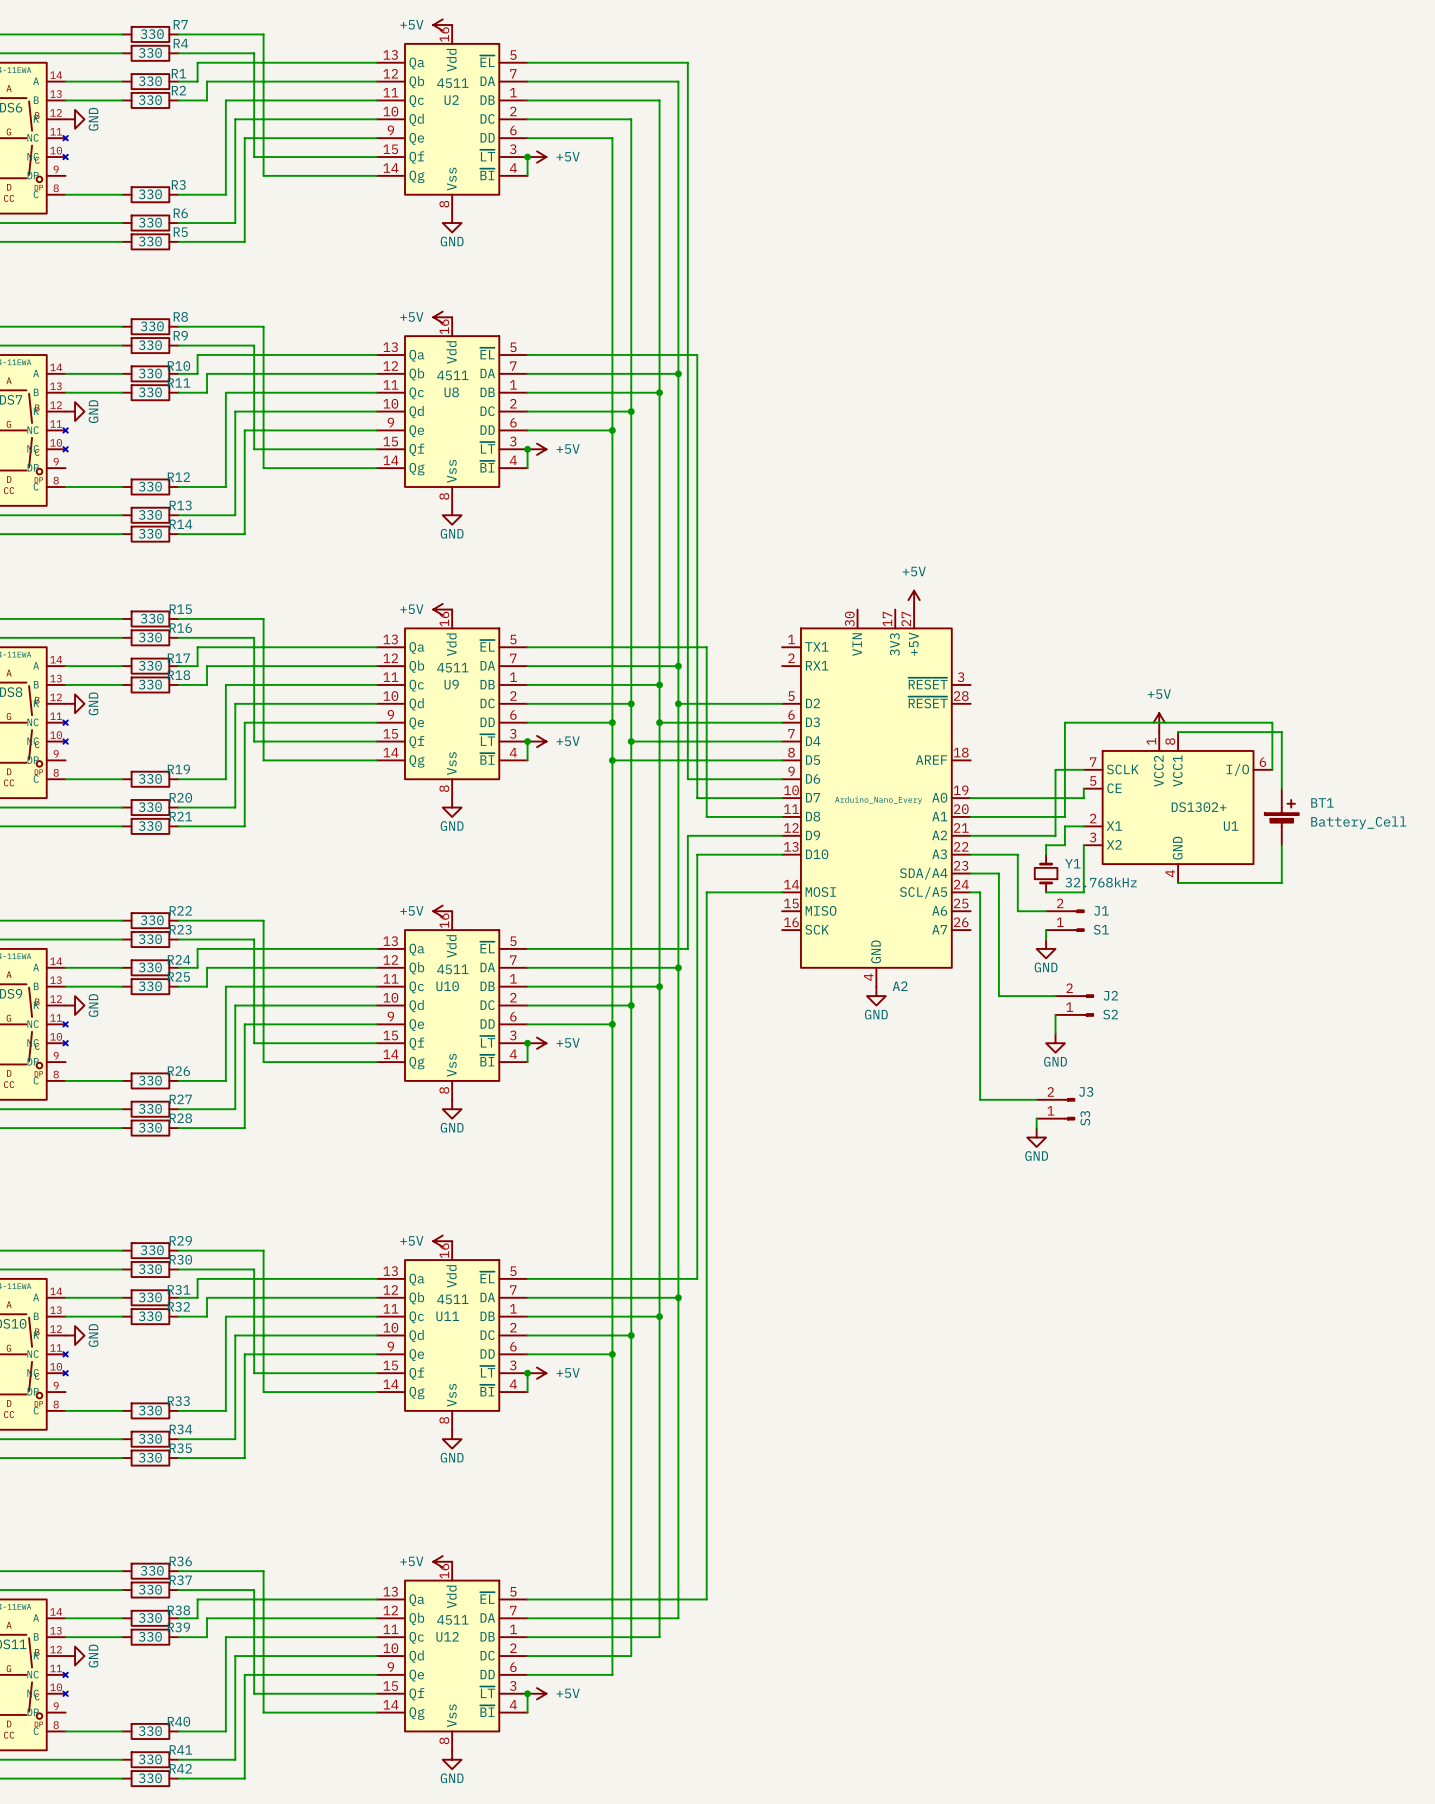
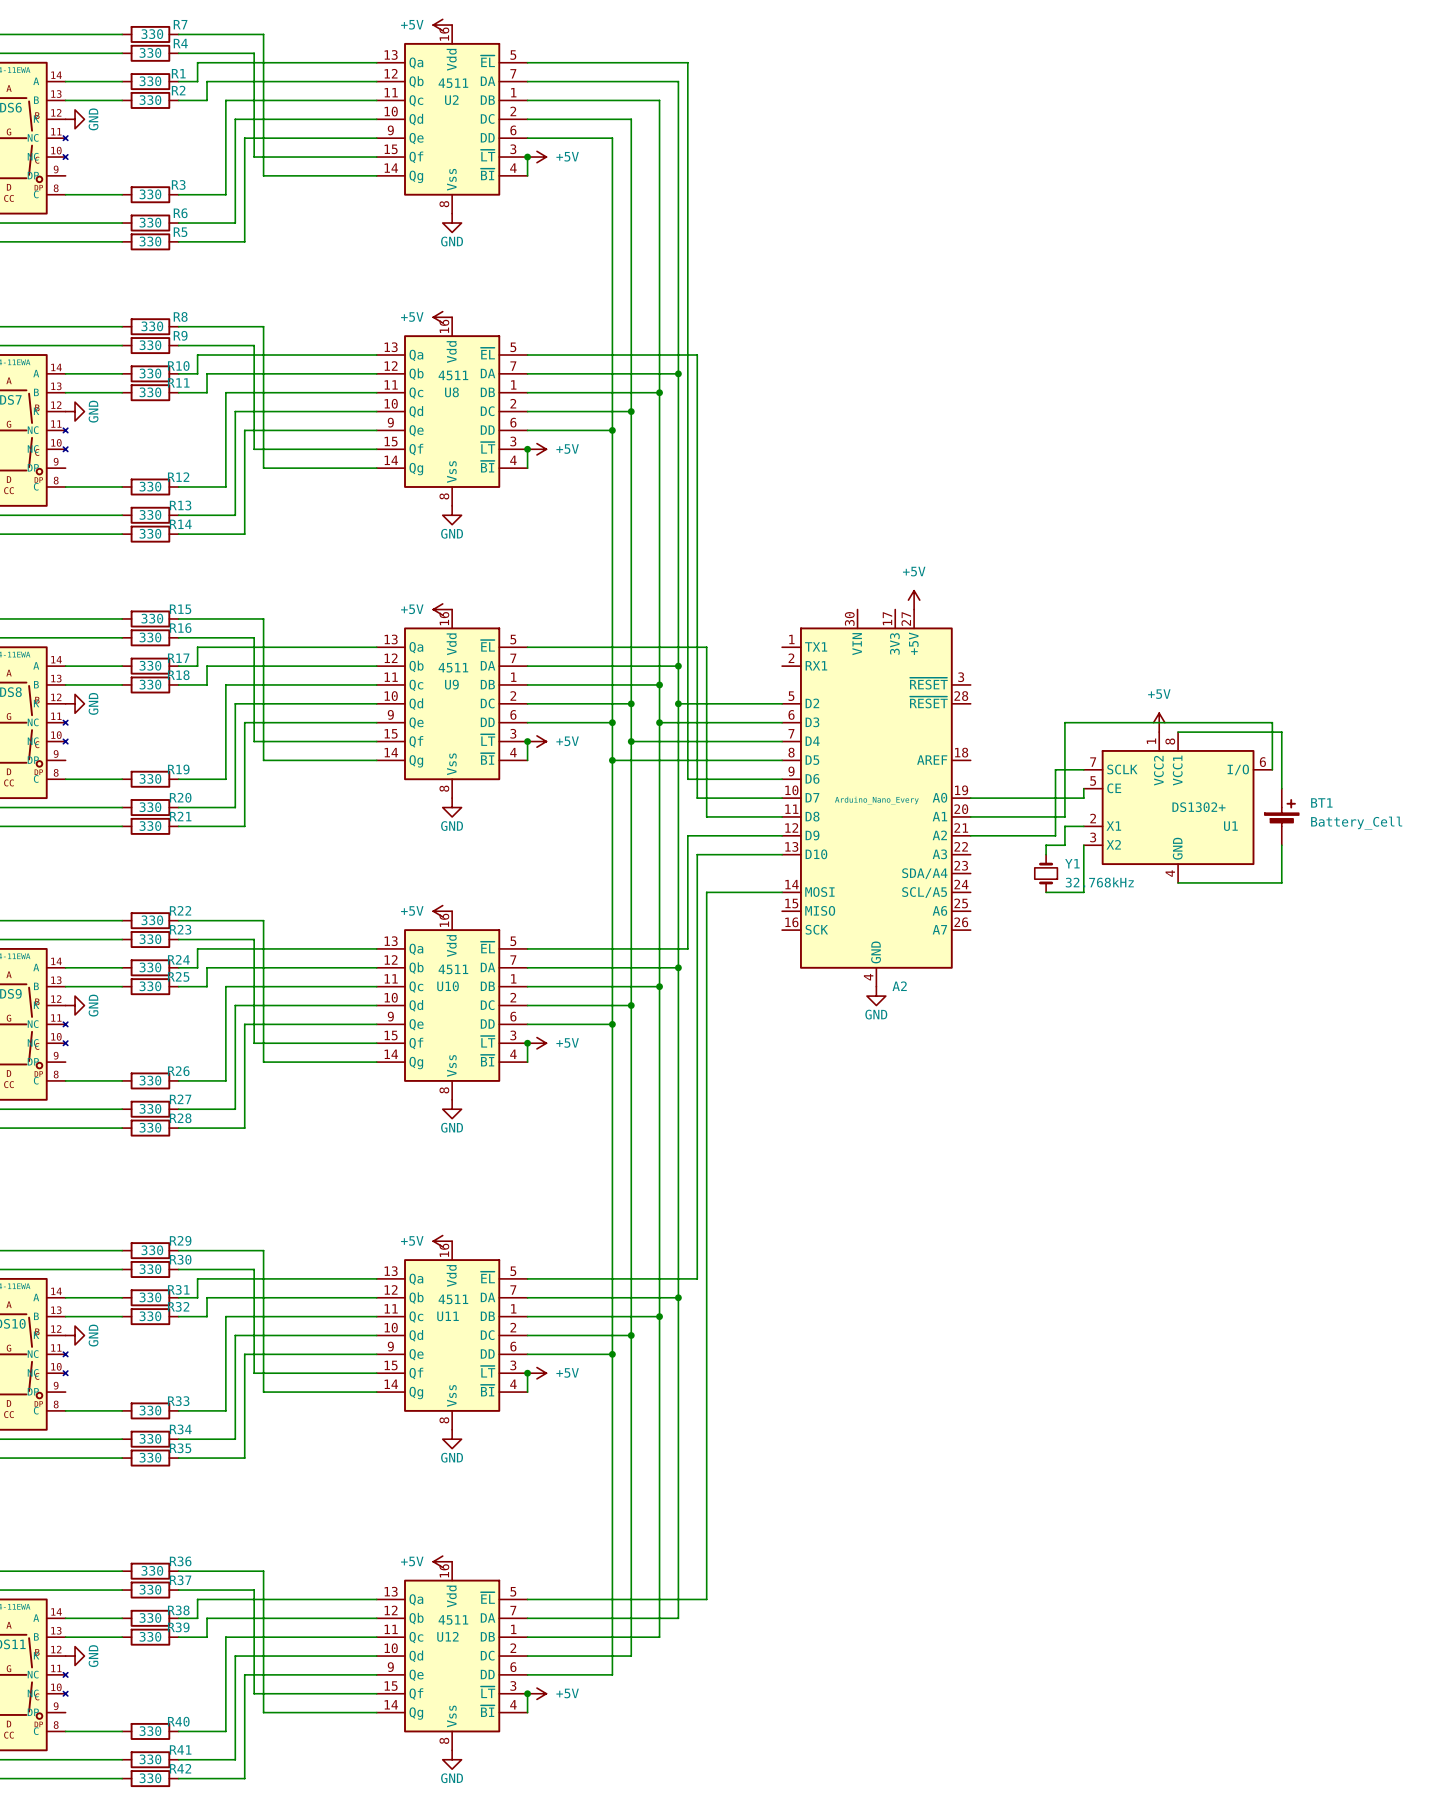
wire: (970, 854) (1017, 854) (1017, 911) (1046, 911) -> none
wire: (970, 873) (998, 873) (998, 996) (1055, 996) -> none
wire: (970, 892) (980, 892) (980, 1099) (1036, 1099) -> none
J1: S1 (1065, 920) -> none
wire: (1046, 930) (1046, 939) -> none
power symbol: GND (1046, 948) -> none
J2: S2 (1074, 1005) -> none
wire: (1055, 1014) (1055, 1033) -> none
power symbol: GND (1055, 1043) -> none
J3: S3 (1055, 1109) -> none
wire: (1036, 1118) (1036, 1128) -> none
power symbol: GND (1036, 1137) -> none

